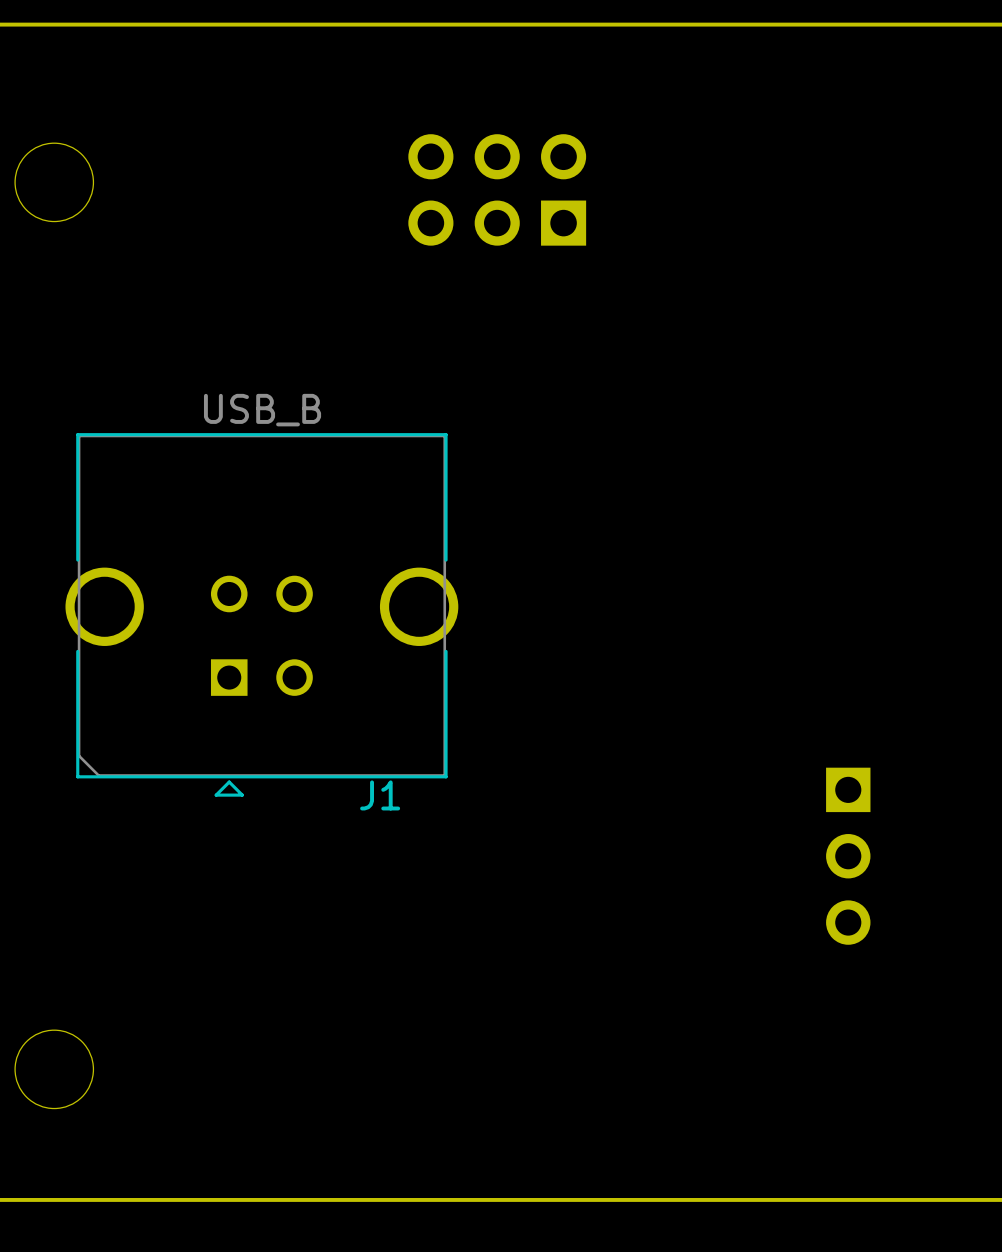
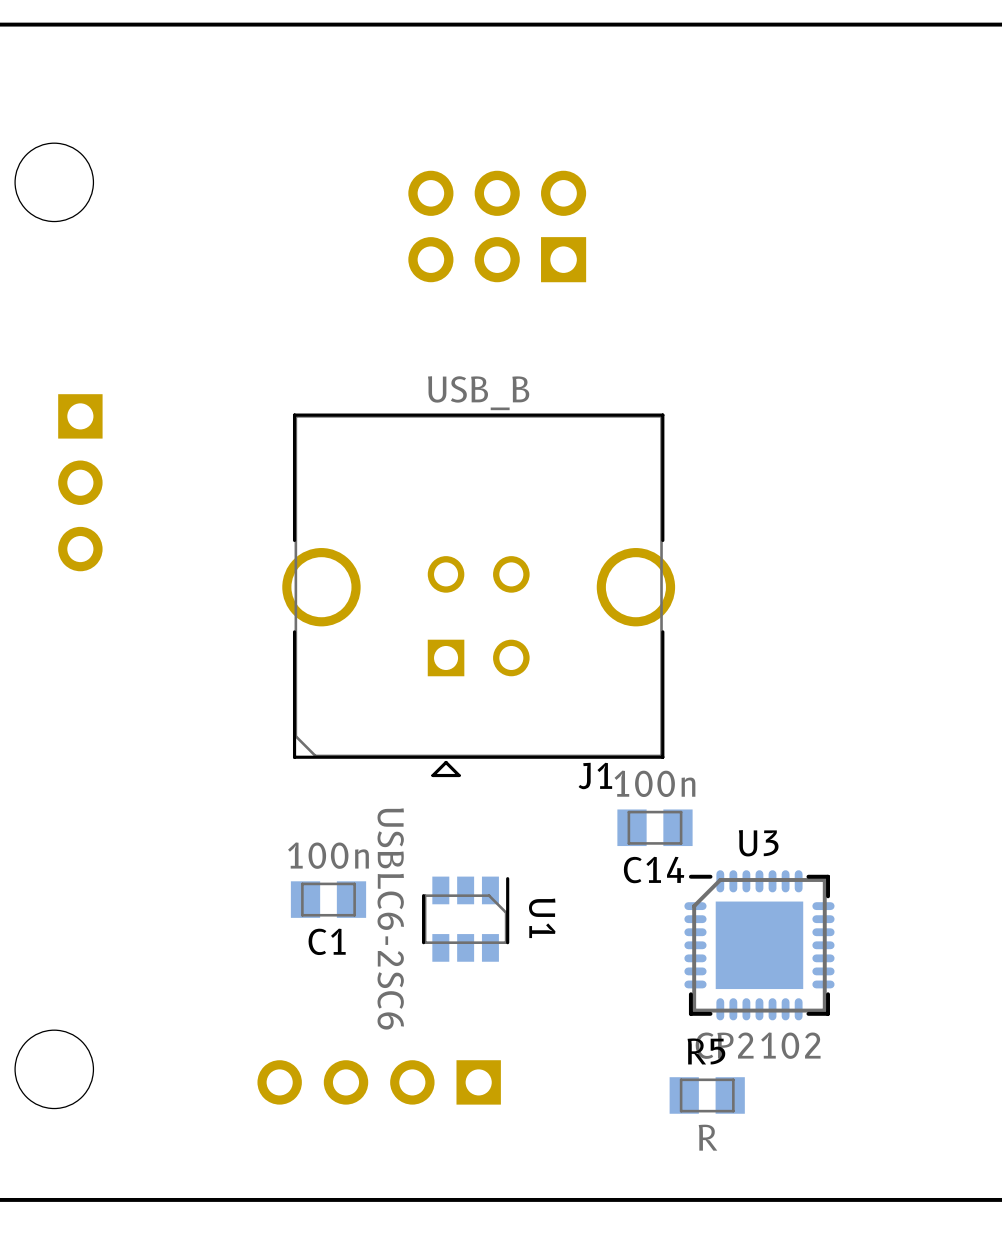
part position: (497, 189) -> (497, 226)
part: none -> (80, 482)
J1 position: (261, 614) -> (478, 595)
C14: none -> 100n (654, 827)
part: (848, 856) -> none
C1: none -> 100n (328, 899)
U1: none -> USBLC6-2SC6 (465, 919)
U3: none -> CP2102 (759, 945)
part: none -> (379, 1082)
R5: none -> R (707, 1095)

